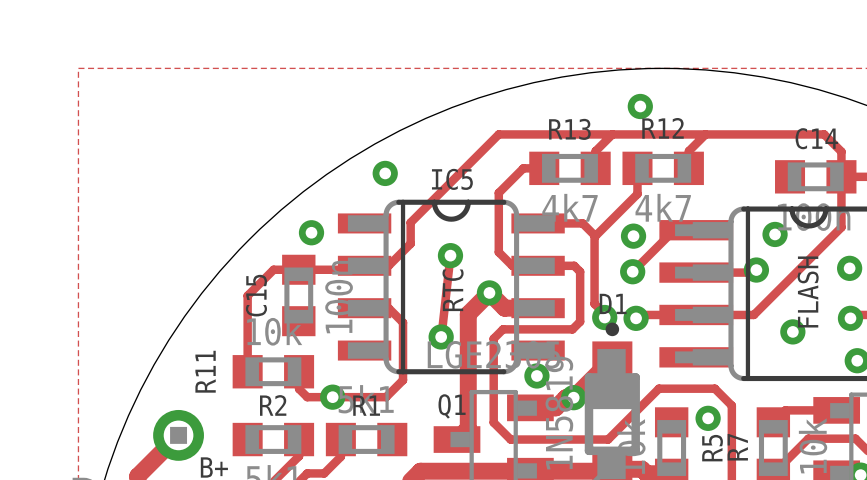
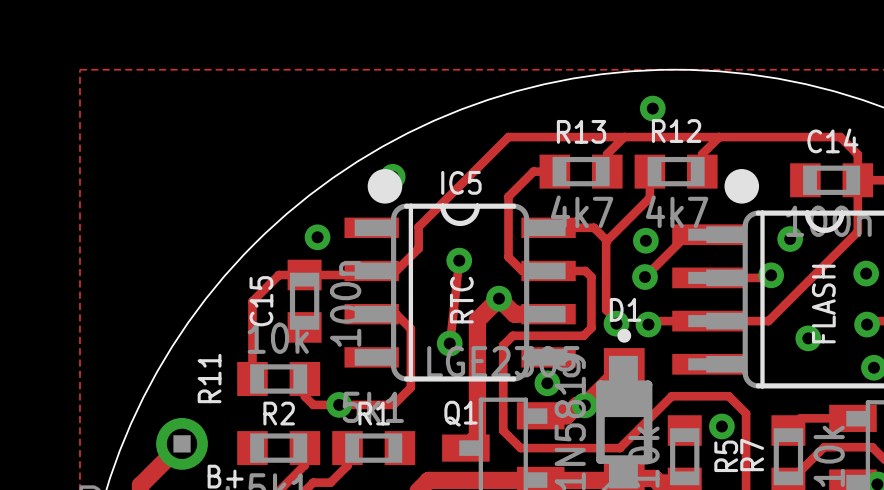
drawing: none -> [367, 169, 403, 204]
drawing: none -> [724, 169, 760, 204]

